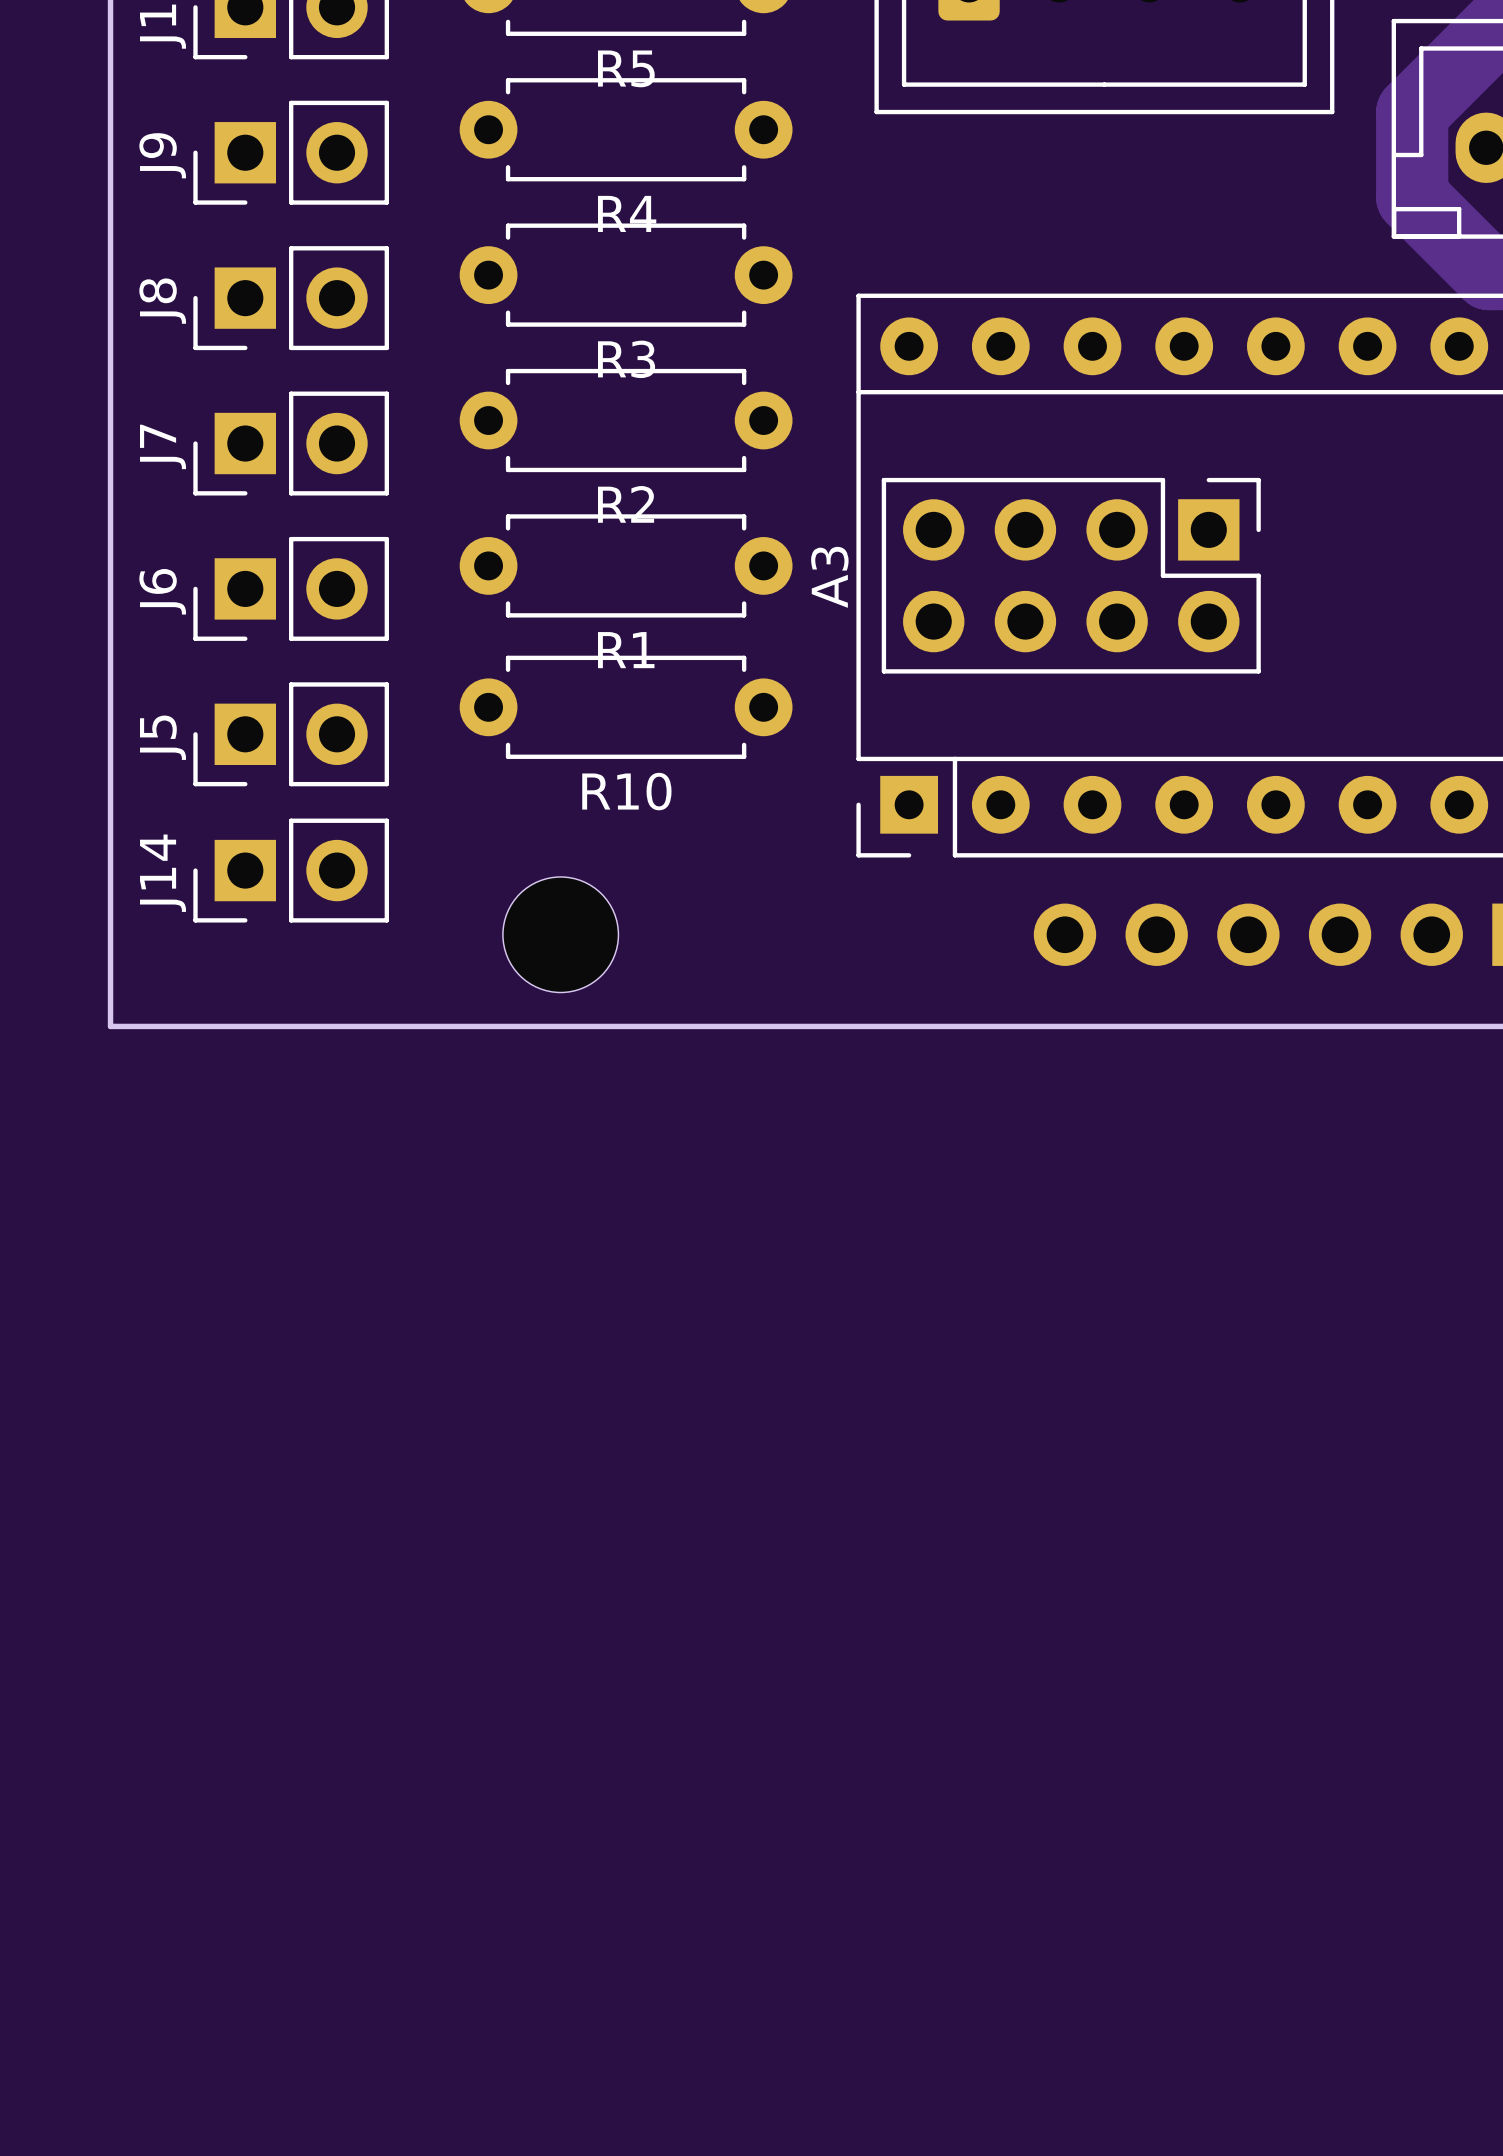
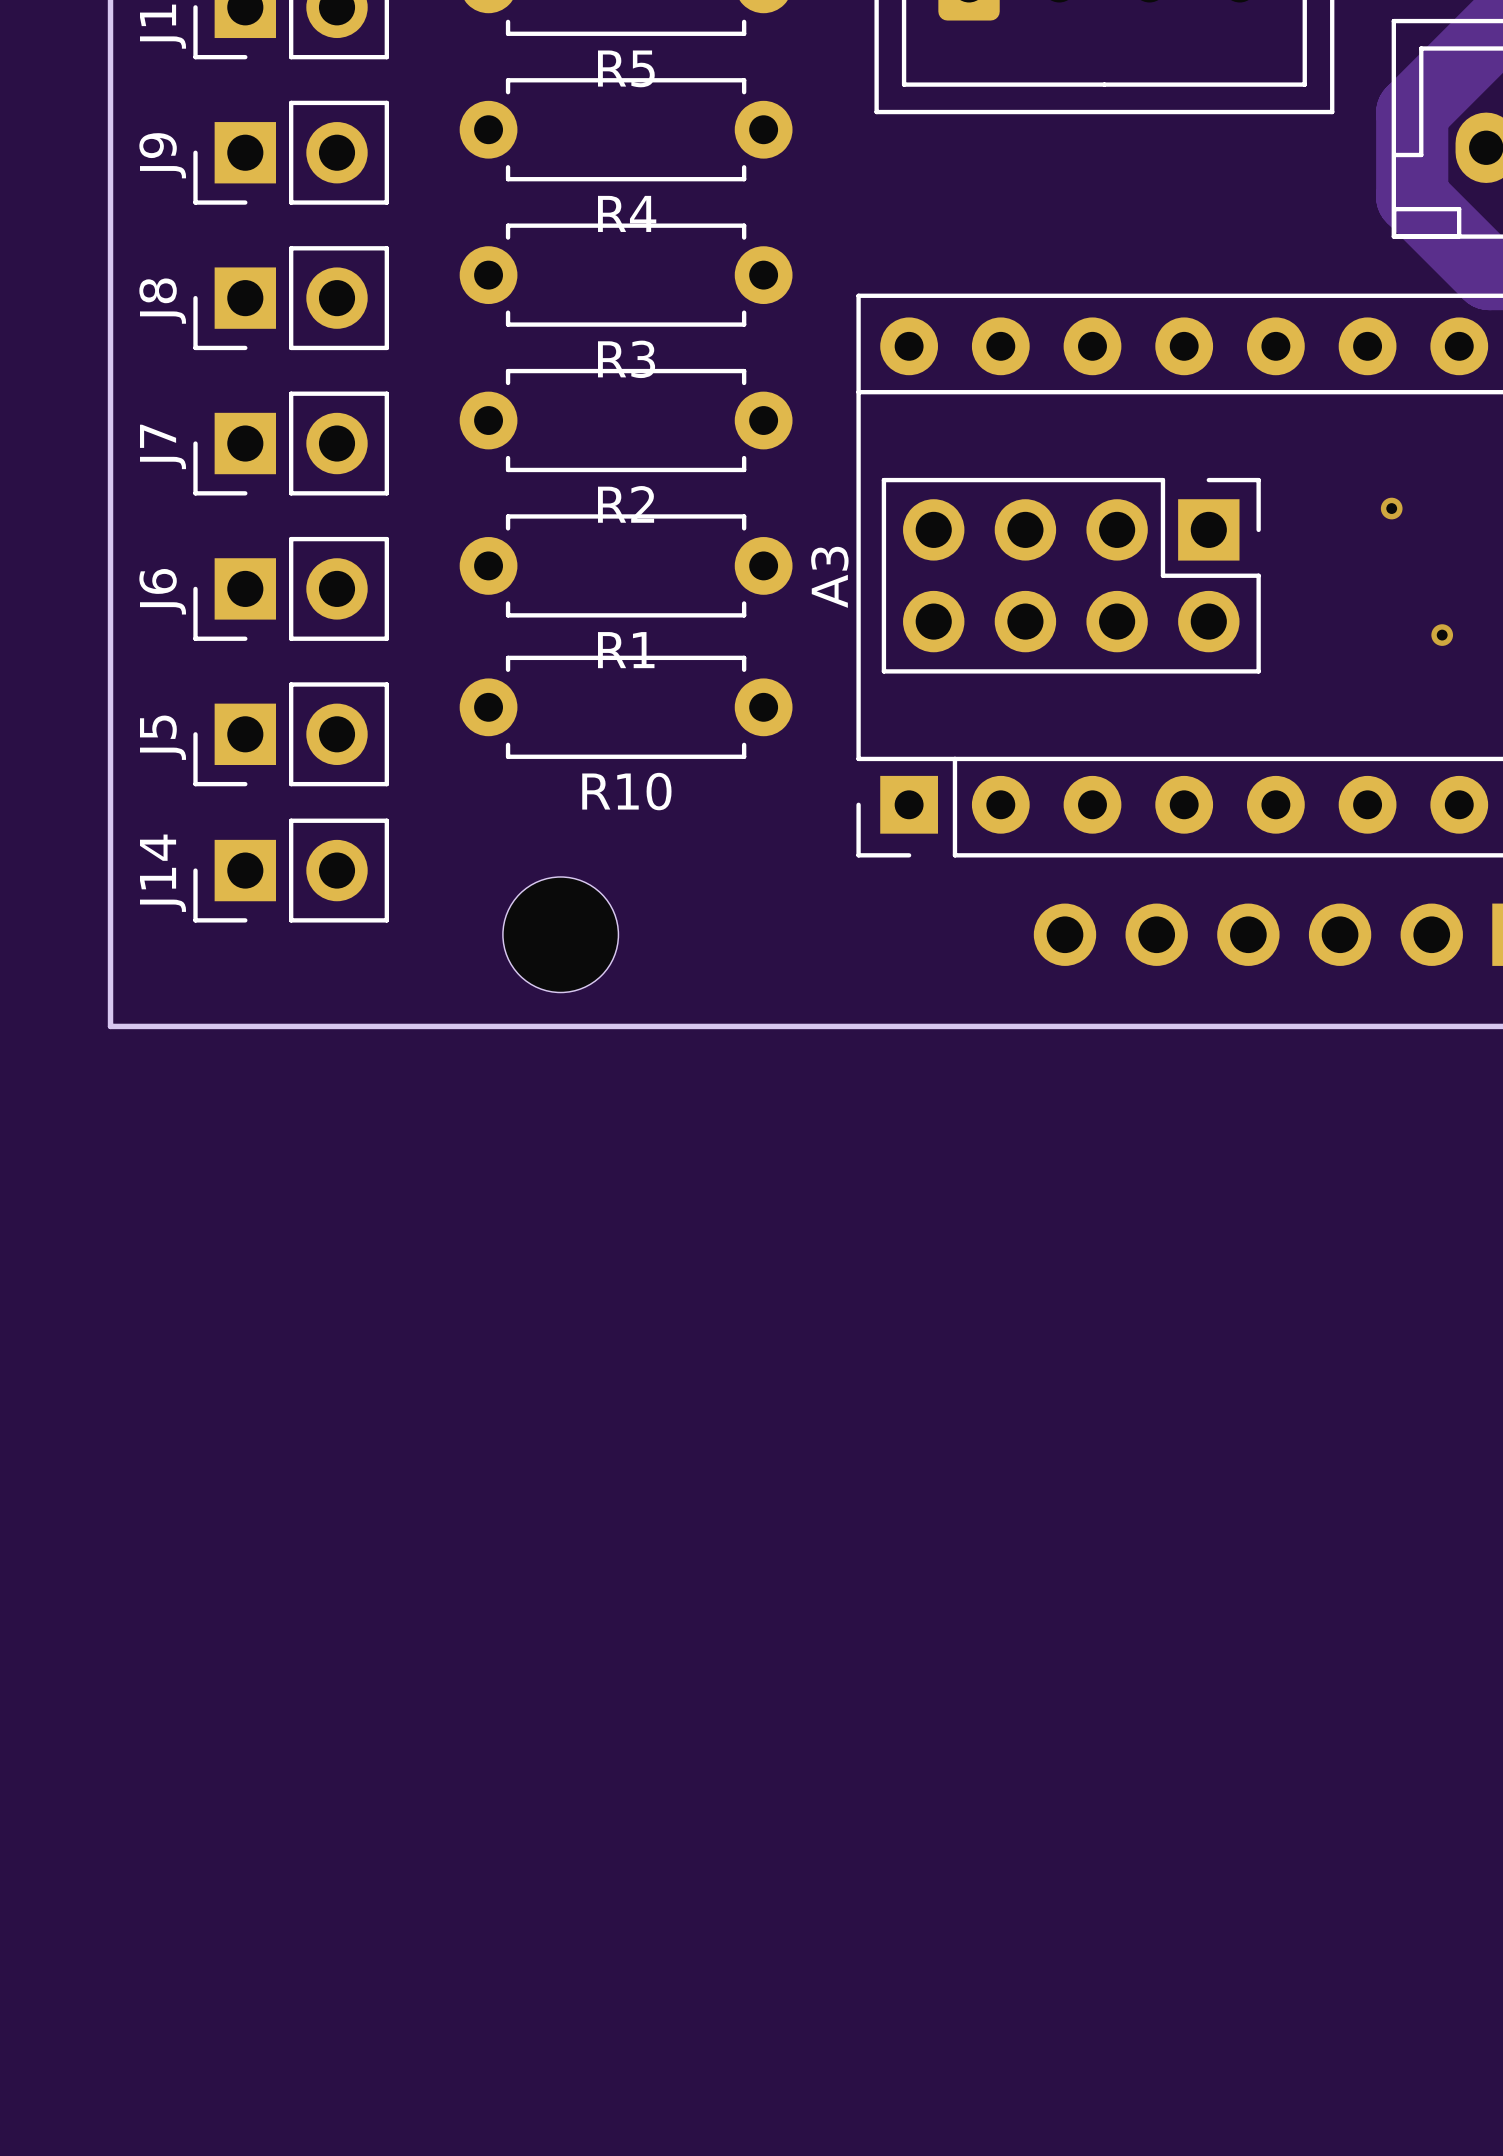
via: none -> (1391, 508)
via: none -> (1442, 635)

